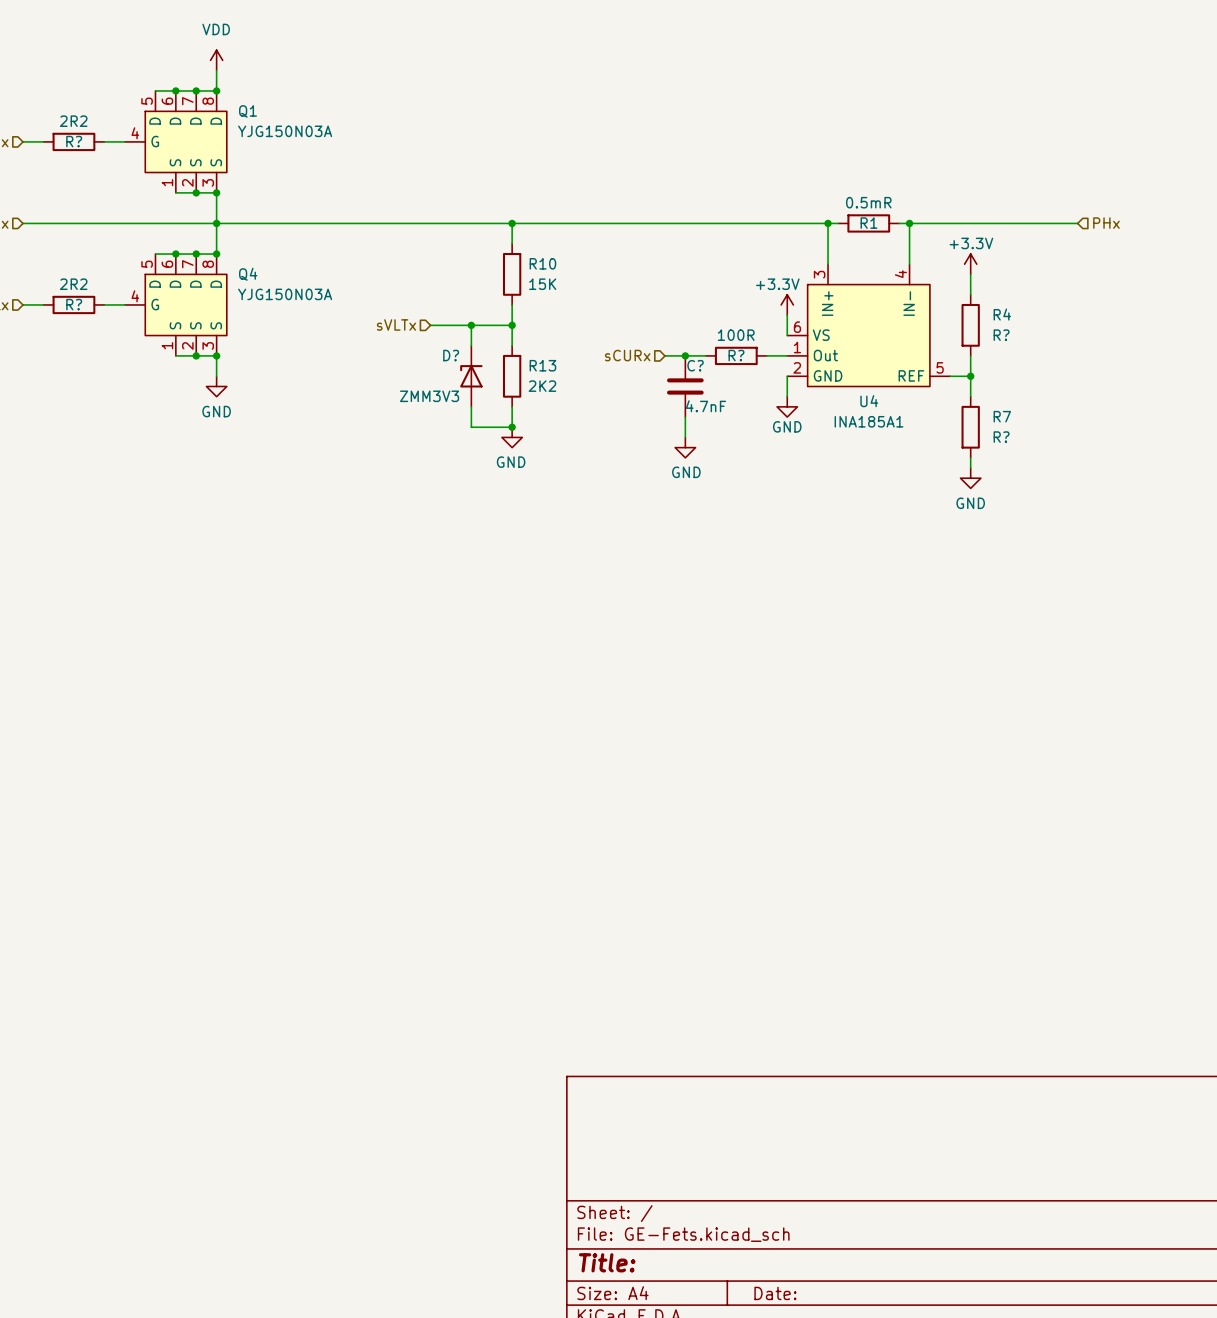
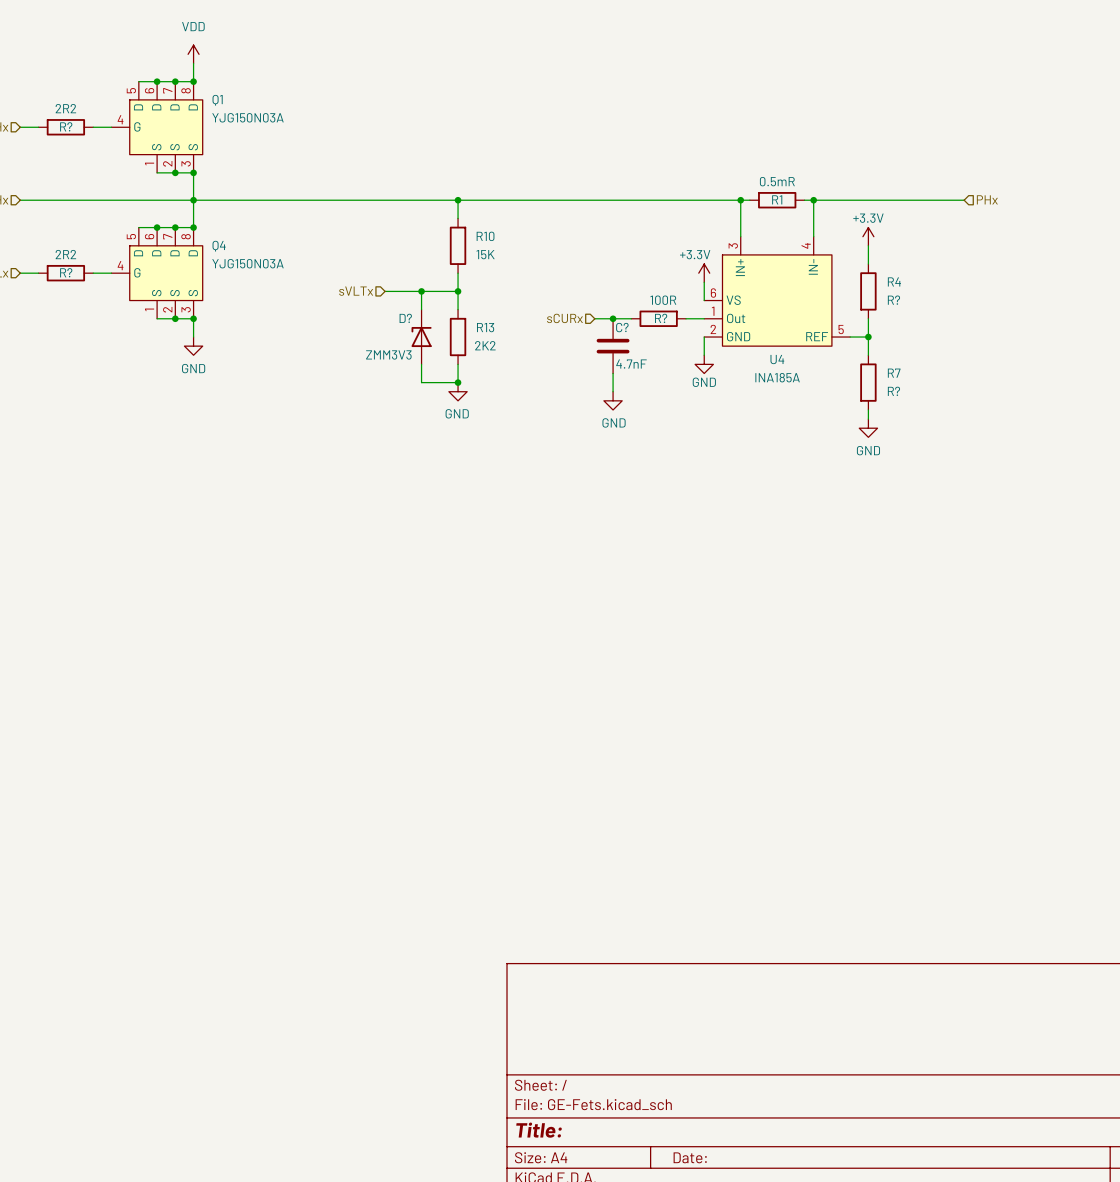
U4 value: INA185A1 (869, 421) -> INA185A (777, 377)

